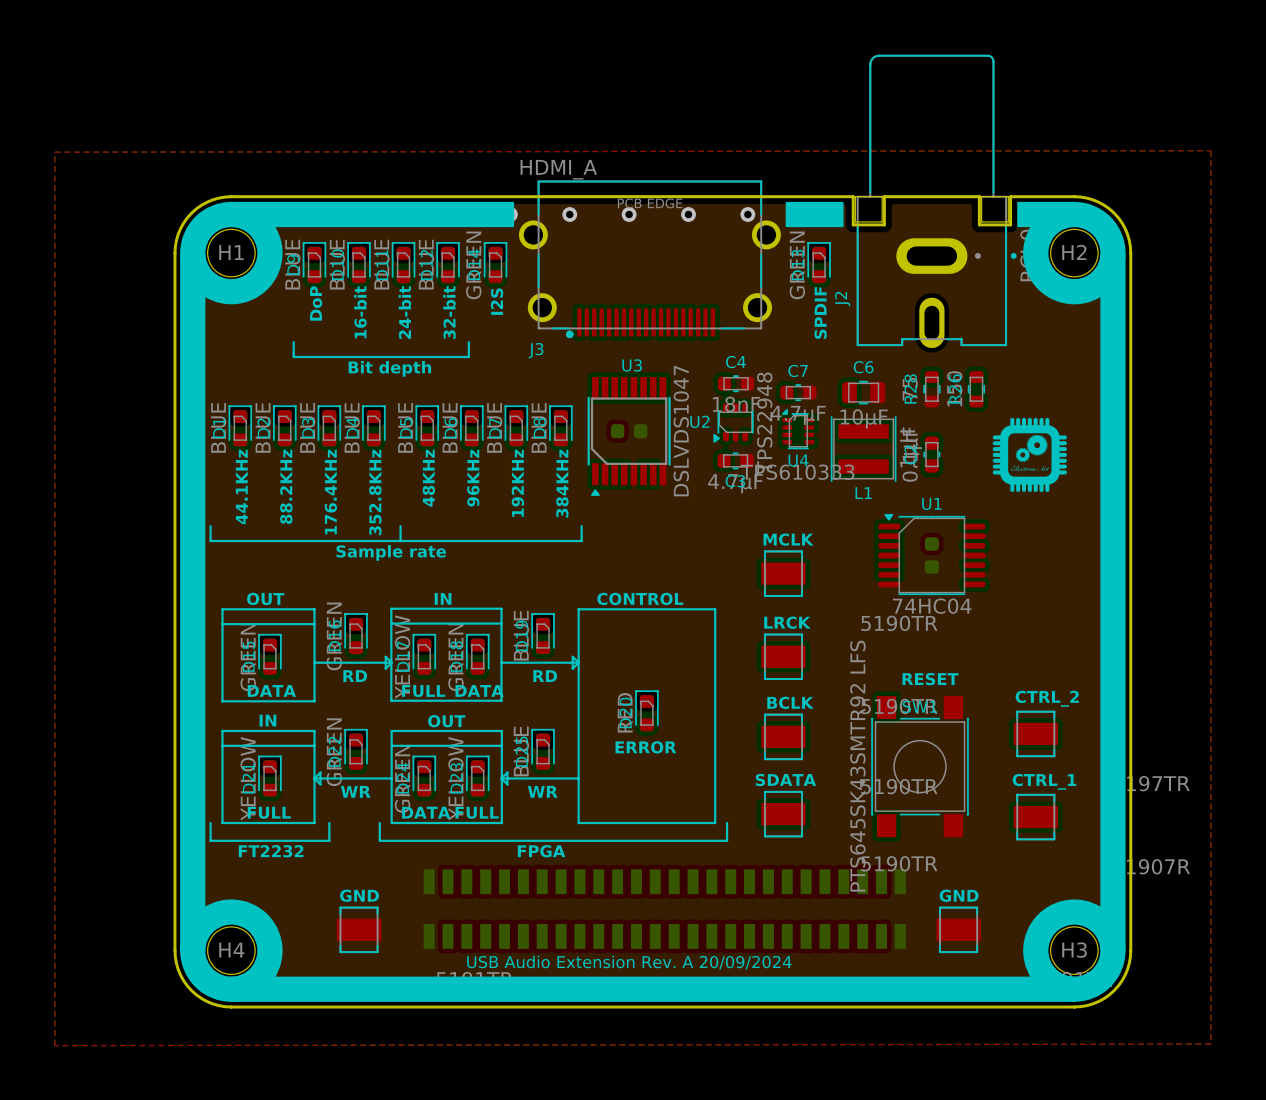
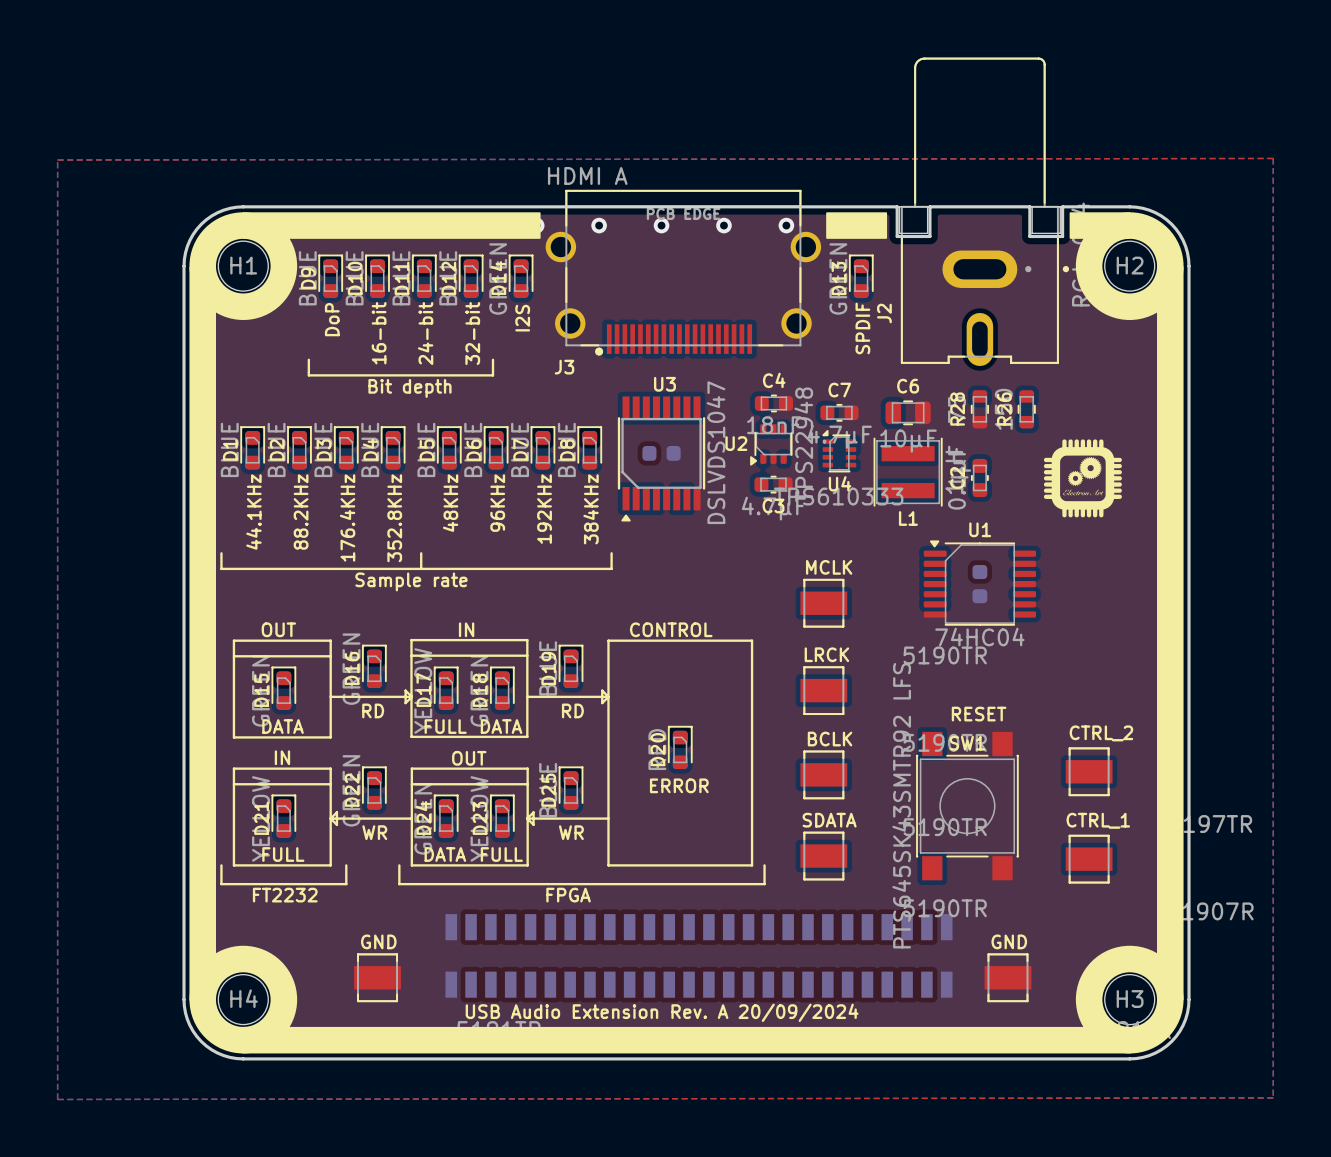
J3 value: HDMI_A (558, 169) -> HDMI A (587, 175)

